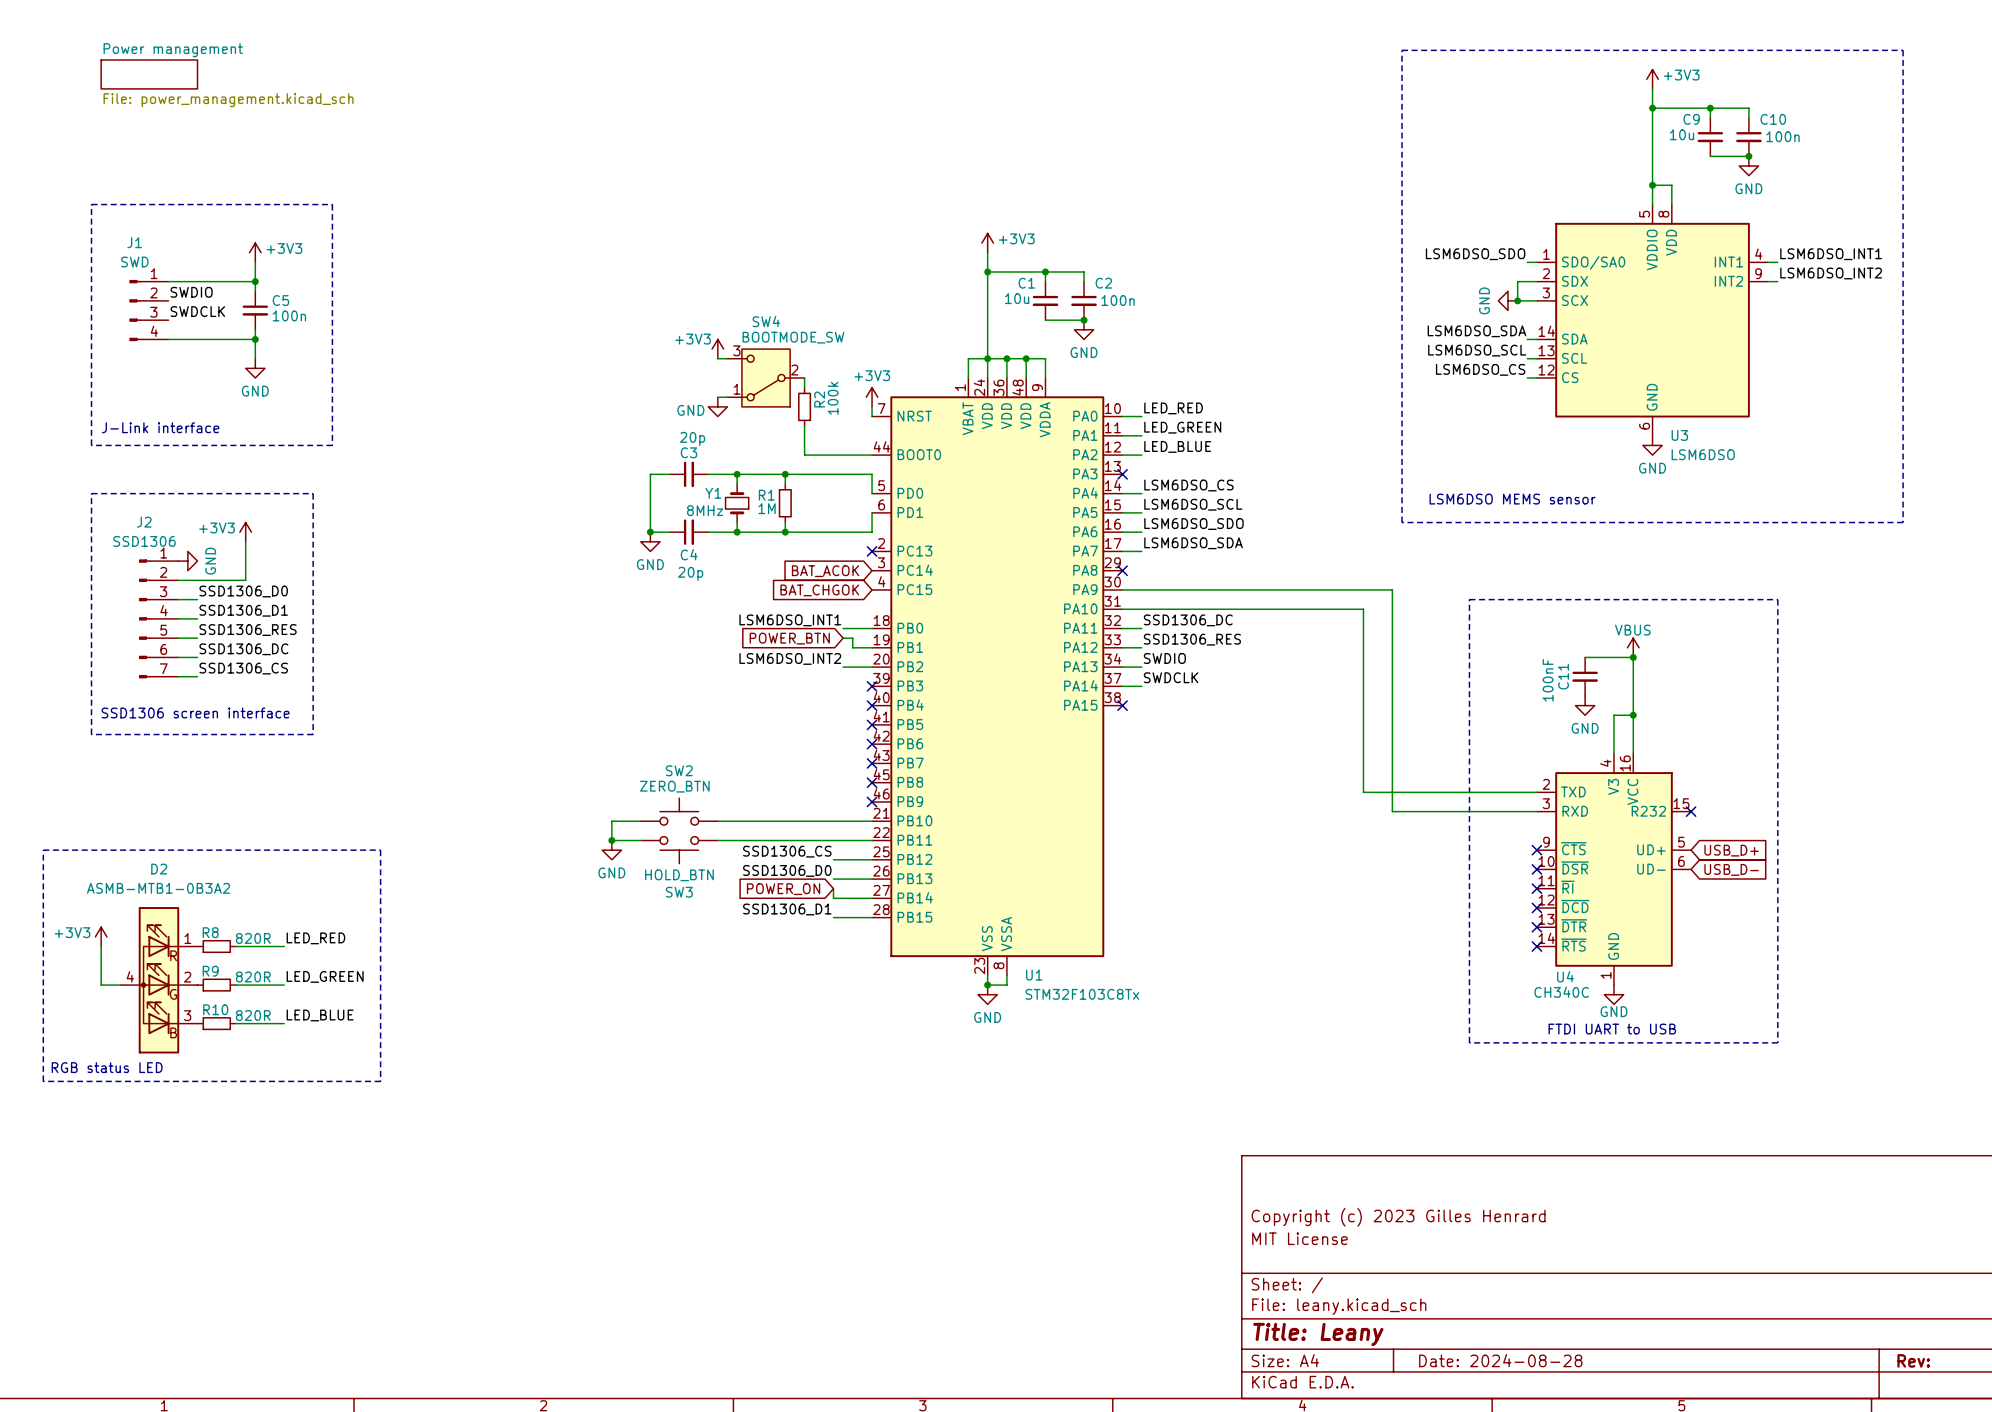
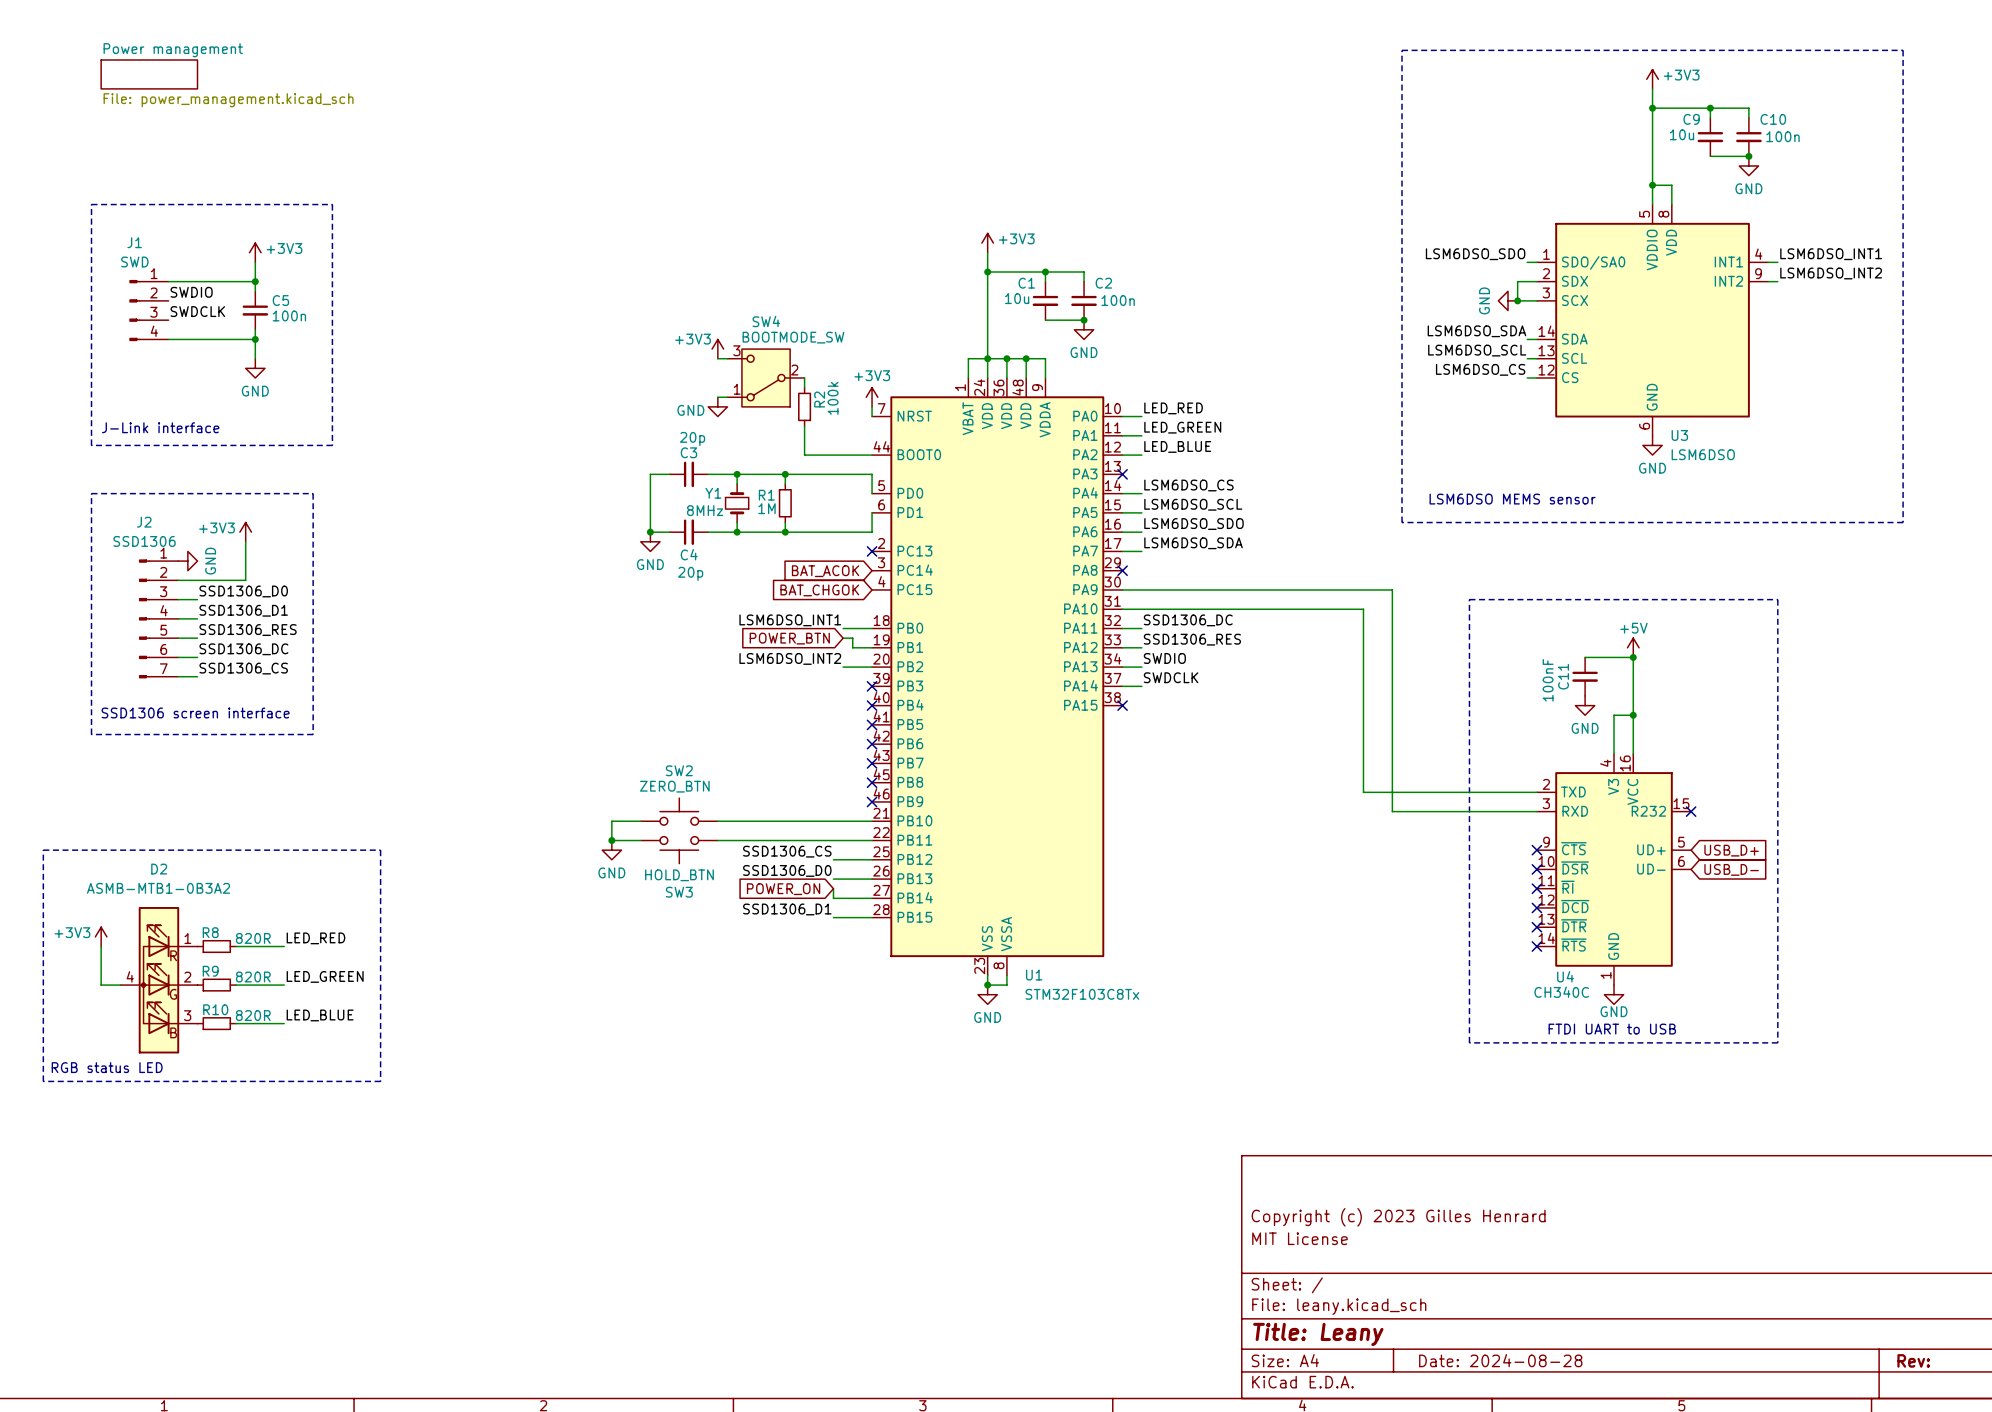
power symbol: VBUS (1633, 647) -> +5V (1633, 647)

